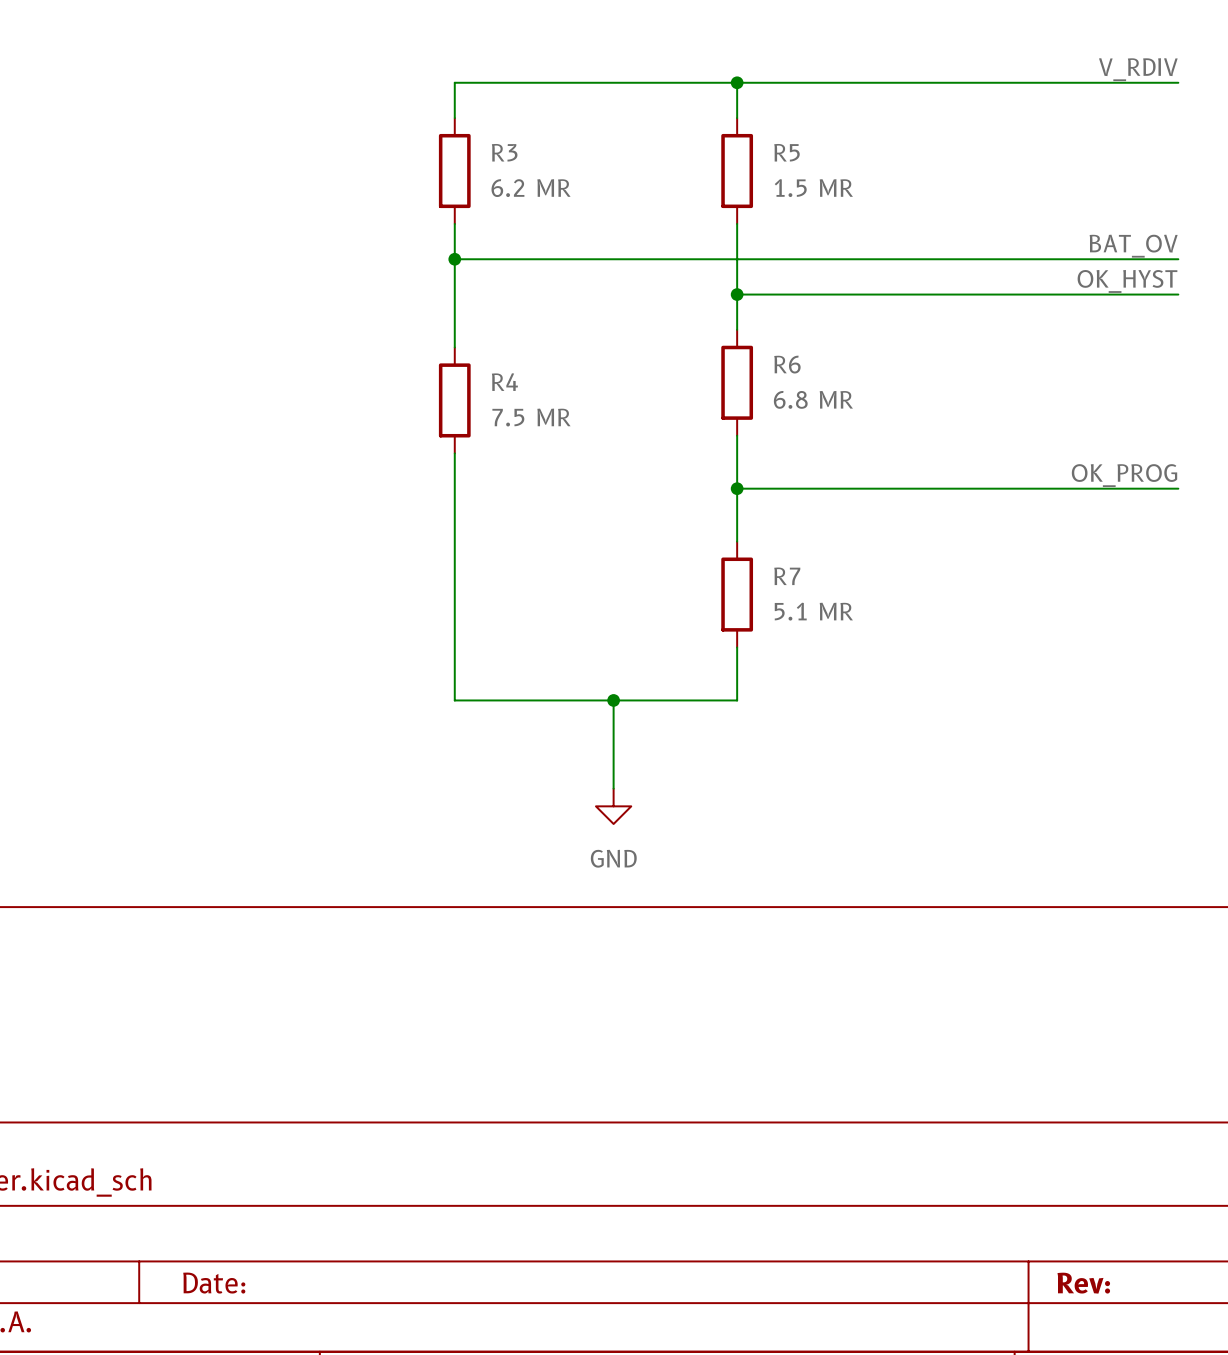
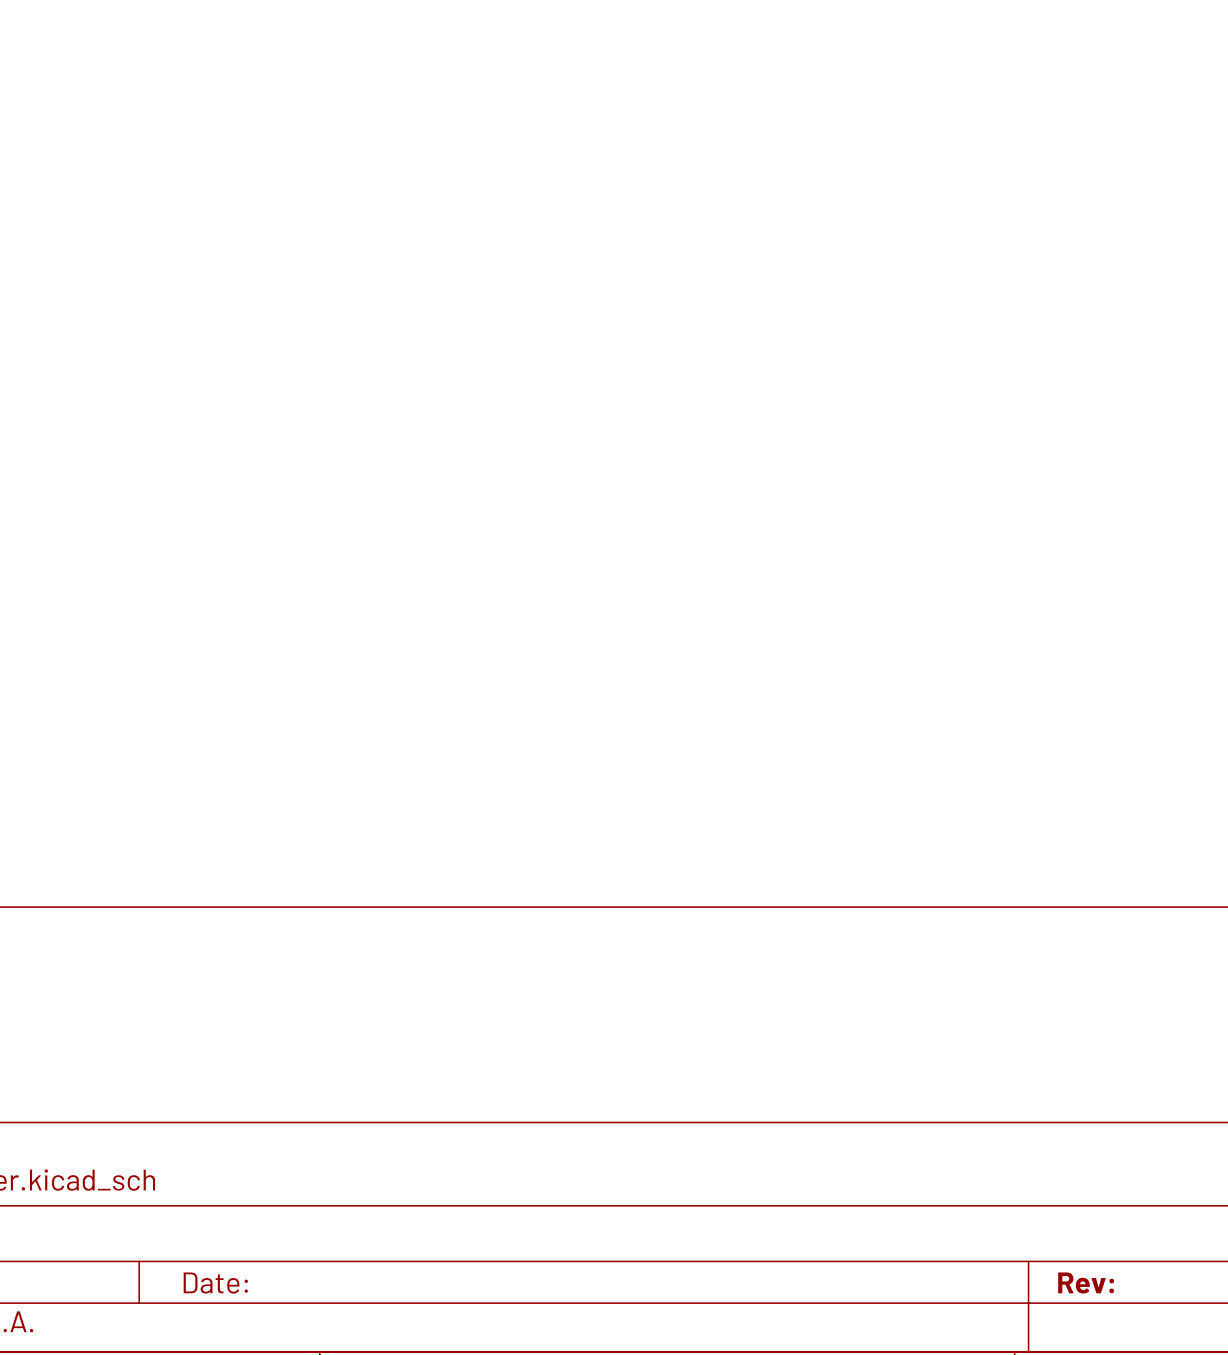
label: V_RDIV (1138, 69) -> none
wire: (737, 82) (737, 118) -> none
junction: (737, 82) -> none
wire: (1178, 82) (454, 82) (454, 118) -> none
R3: 6.2 MR (454, 171) -> none
R5: 1.5 MR (737, 171) -> none
wire: (454, 223) (454, 347) -> none
wire: (737, 223) (737, 329) -> none
label: BAT_OV (1133, 246) -> none
wire: (454, 259) (1178, 259) -> none
junction: (454, 259) -> none
label: OK_HYST (1127, 281) -> none
wire: (737, 294) (1178, 294) -> none
junction: (737, 294) -> none
R6: 6.8 MR (737, 382) -> none
R4: 7.5 MR (454, 400) -> none
wire: (737, 435) (737, 541) -> none
wire: (454, 453) (454, 700) (737, 700) (737, 647) -> none
label: OK_PROG (1124, 475) -> none
wire: (737, 488) (1178, 488) -> none
junction: (737, 488) -> none
R7: 5.1 MR (737, 594) -> none
wire: (613, 700) (613, 788) -> none
junction: (613, 700) -> none
power symbol: GND (613, 806) -> none

